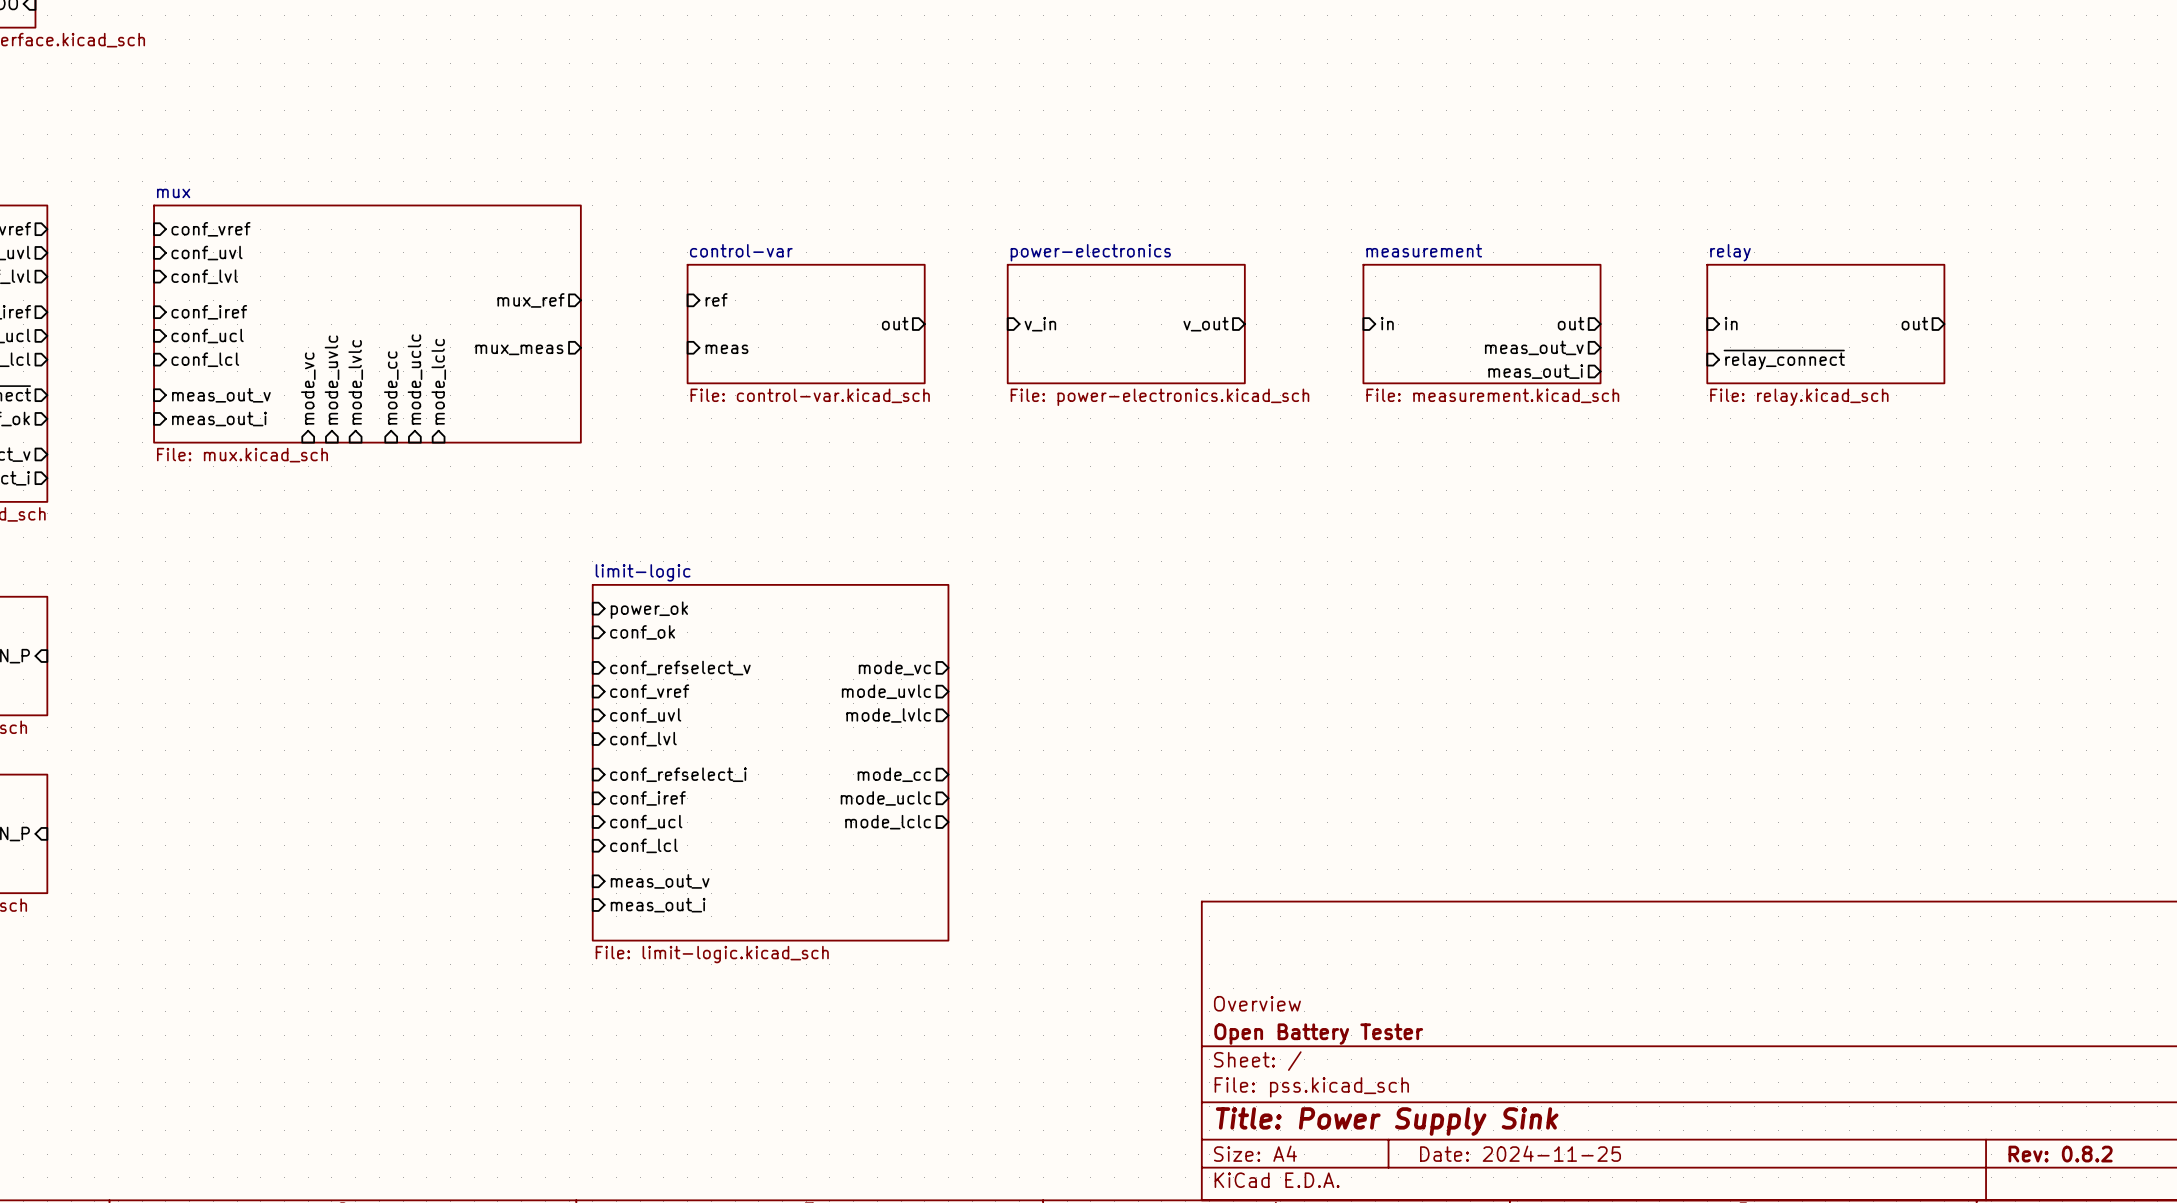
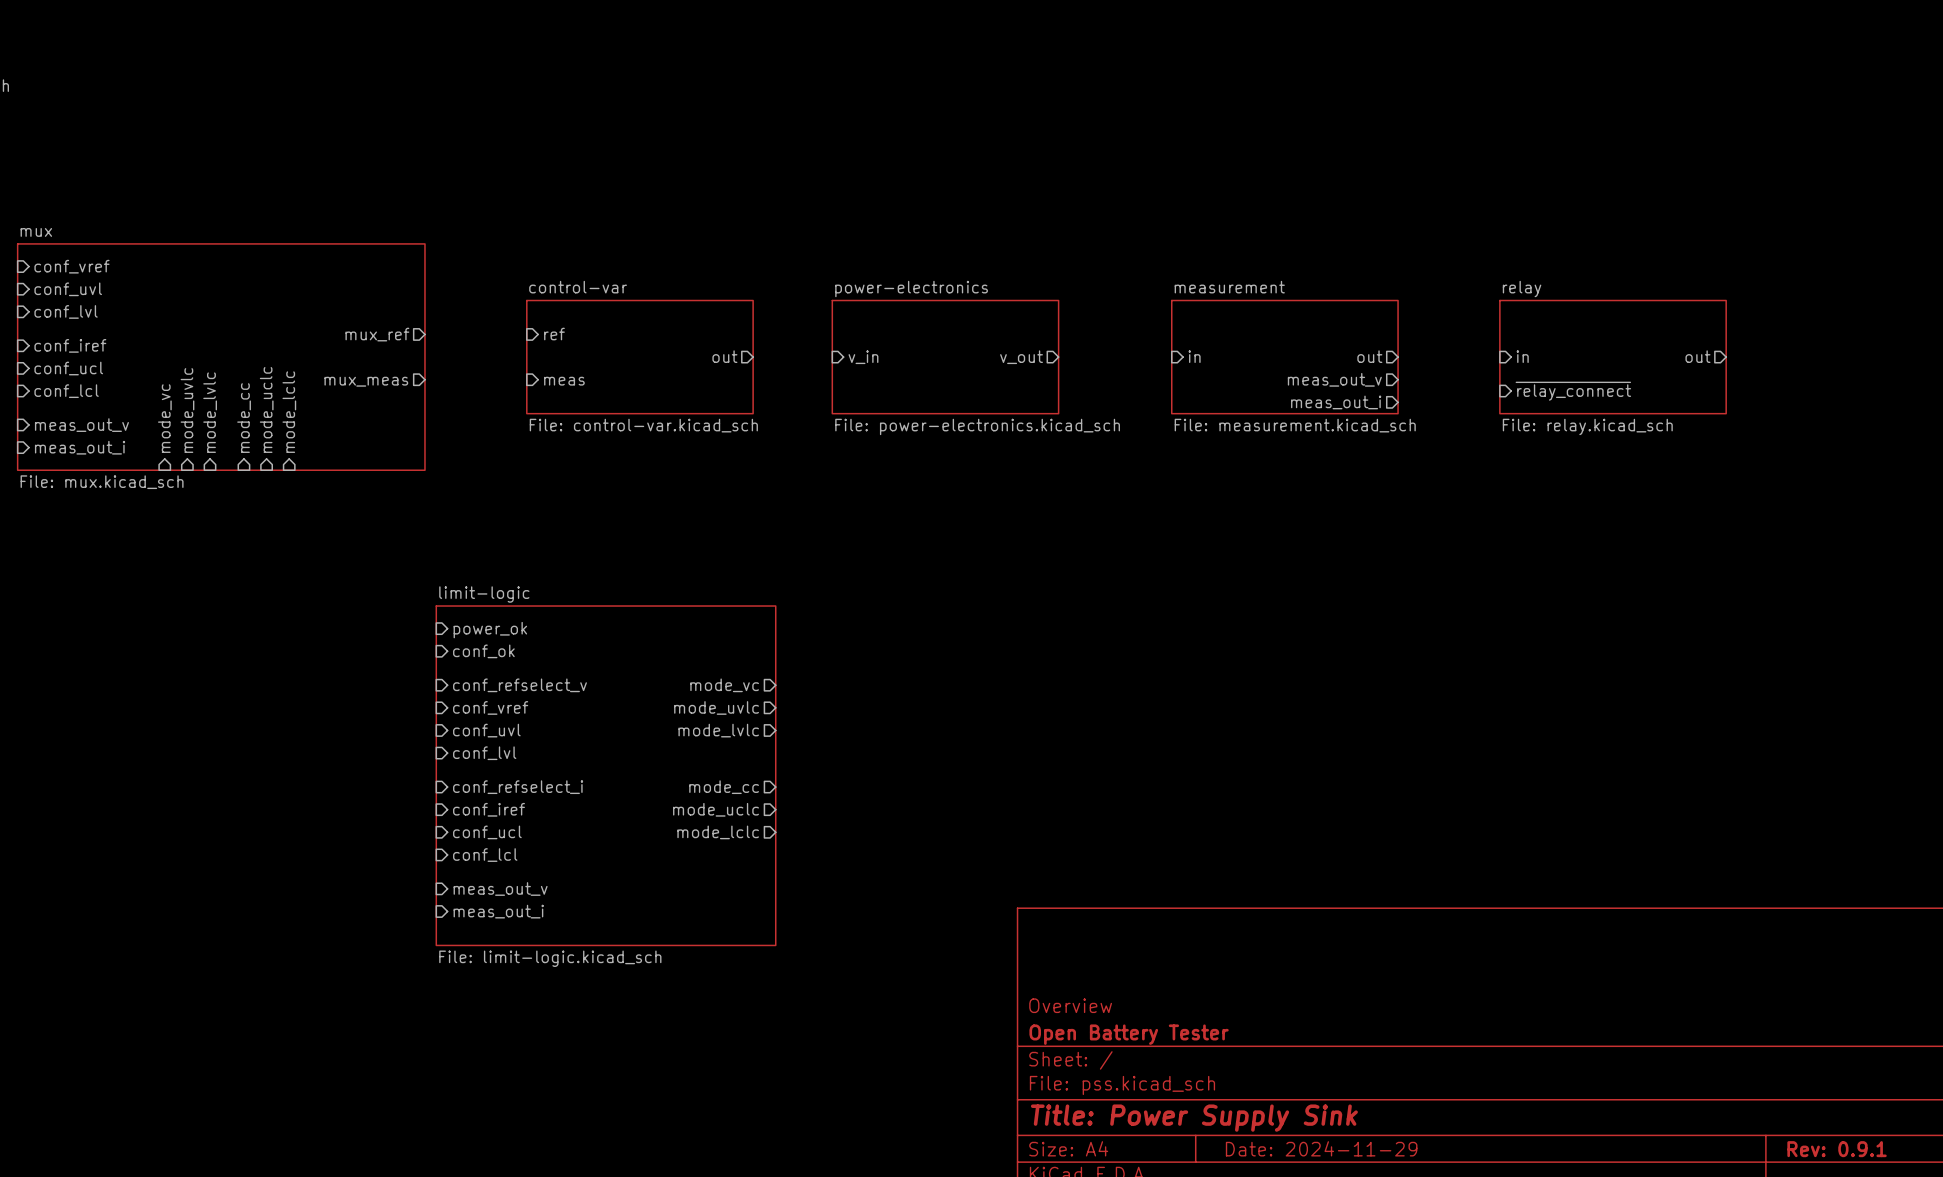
title block: Date: 2024-11-25 (1520, 1153) -> Date: 2024-11-29 (1321, 1148)
title block: Rev: 0.8.2 (2060, 1154) -> Rev: 0.9.1 (1837, 1149)

